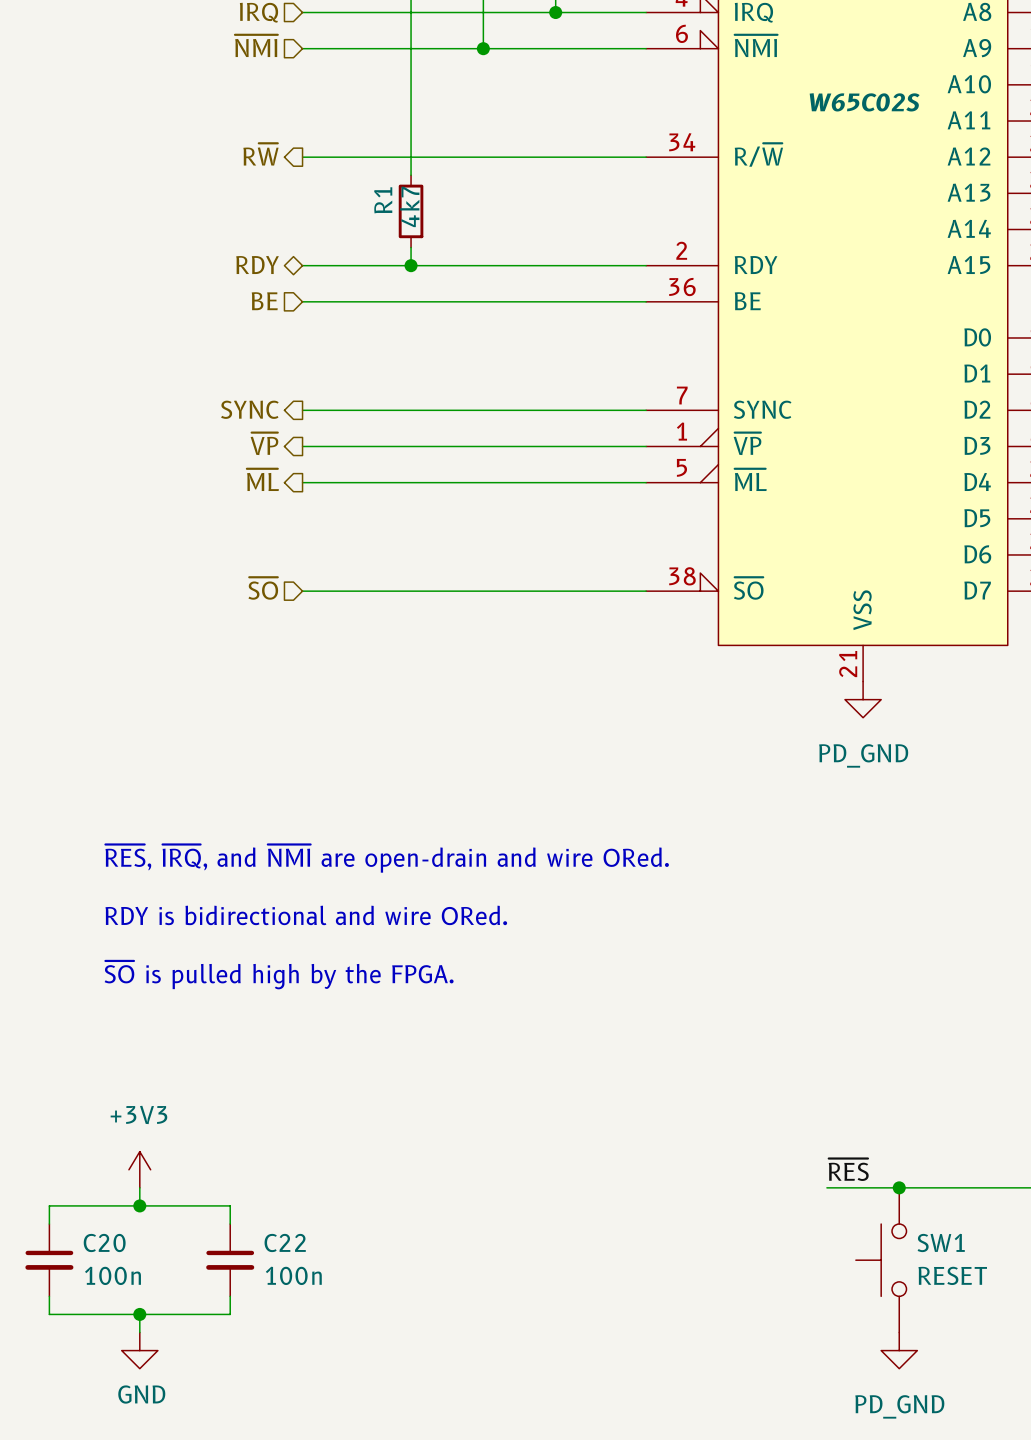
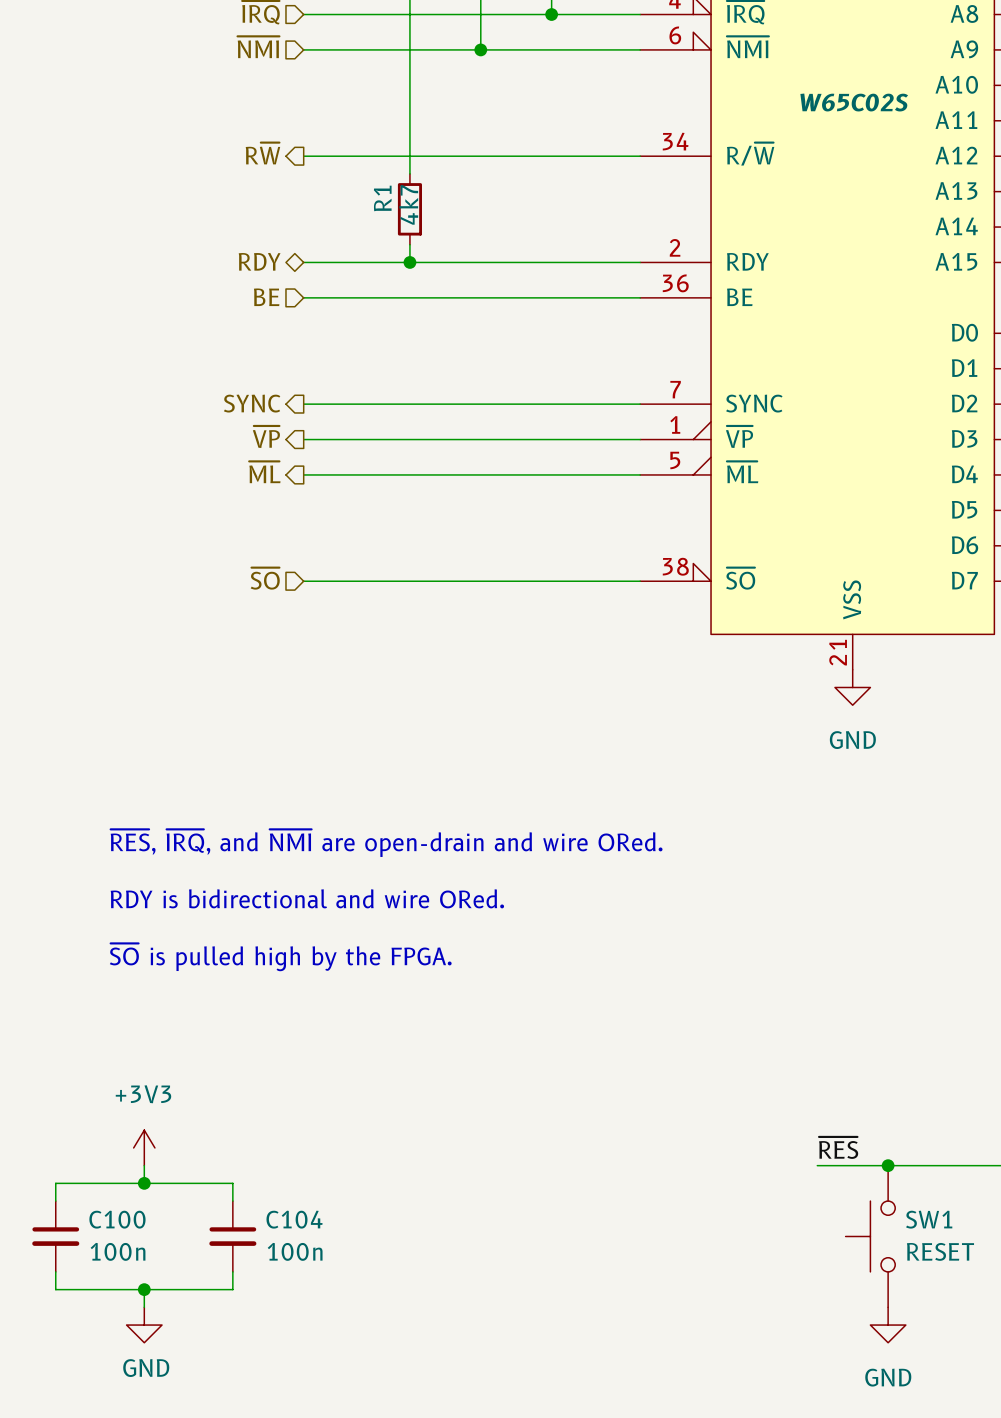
power symbol: PD_GND (863, 699) -> GND (852, 687)
C20 name: C20 (104, 1242) -> C100 (117, 1219)
C22 name: C22 (285, 1242) -> C104 (294, 1219)
power symbol: PD_GND (899, 1350) -> GND (888, 1325)

